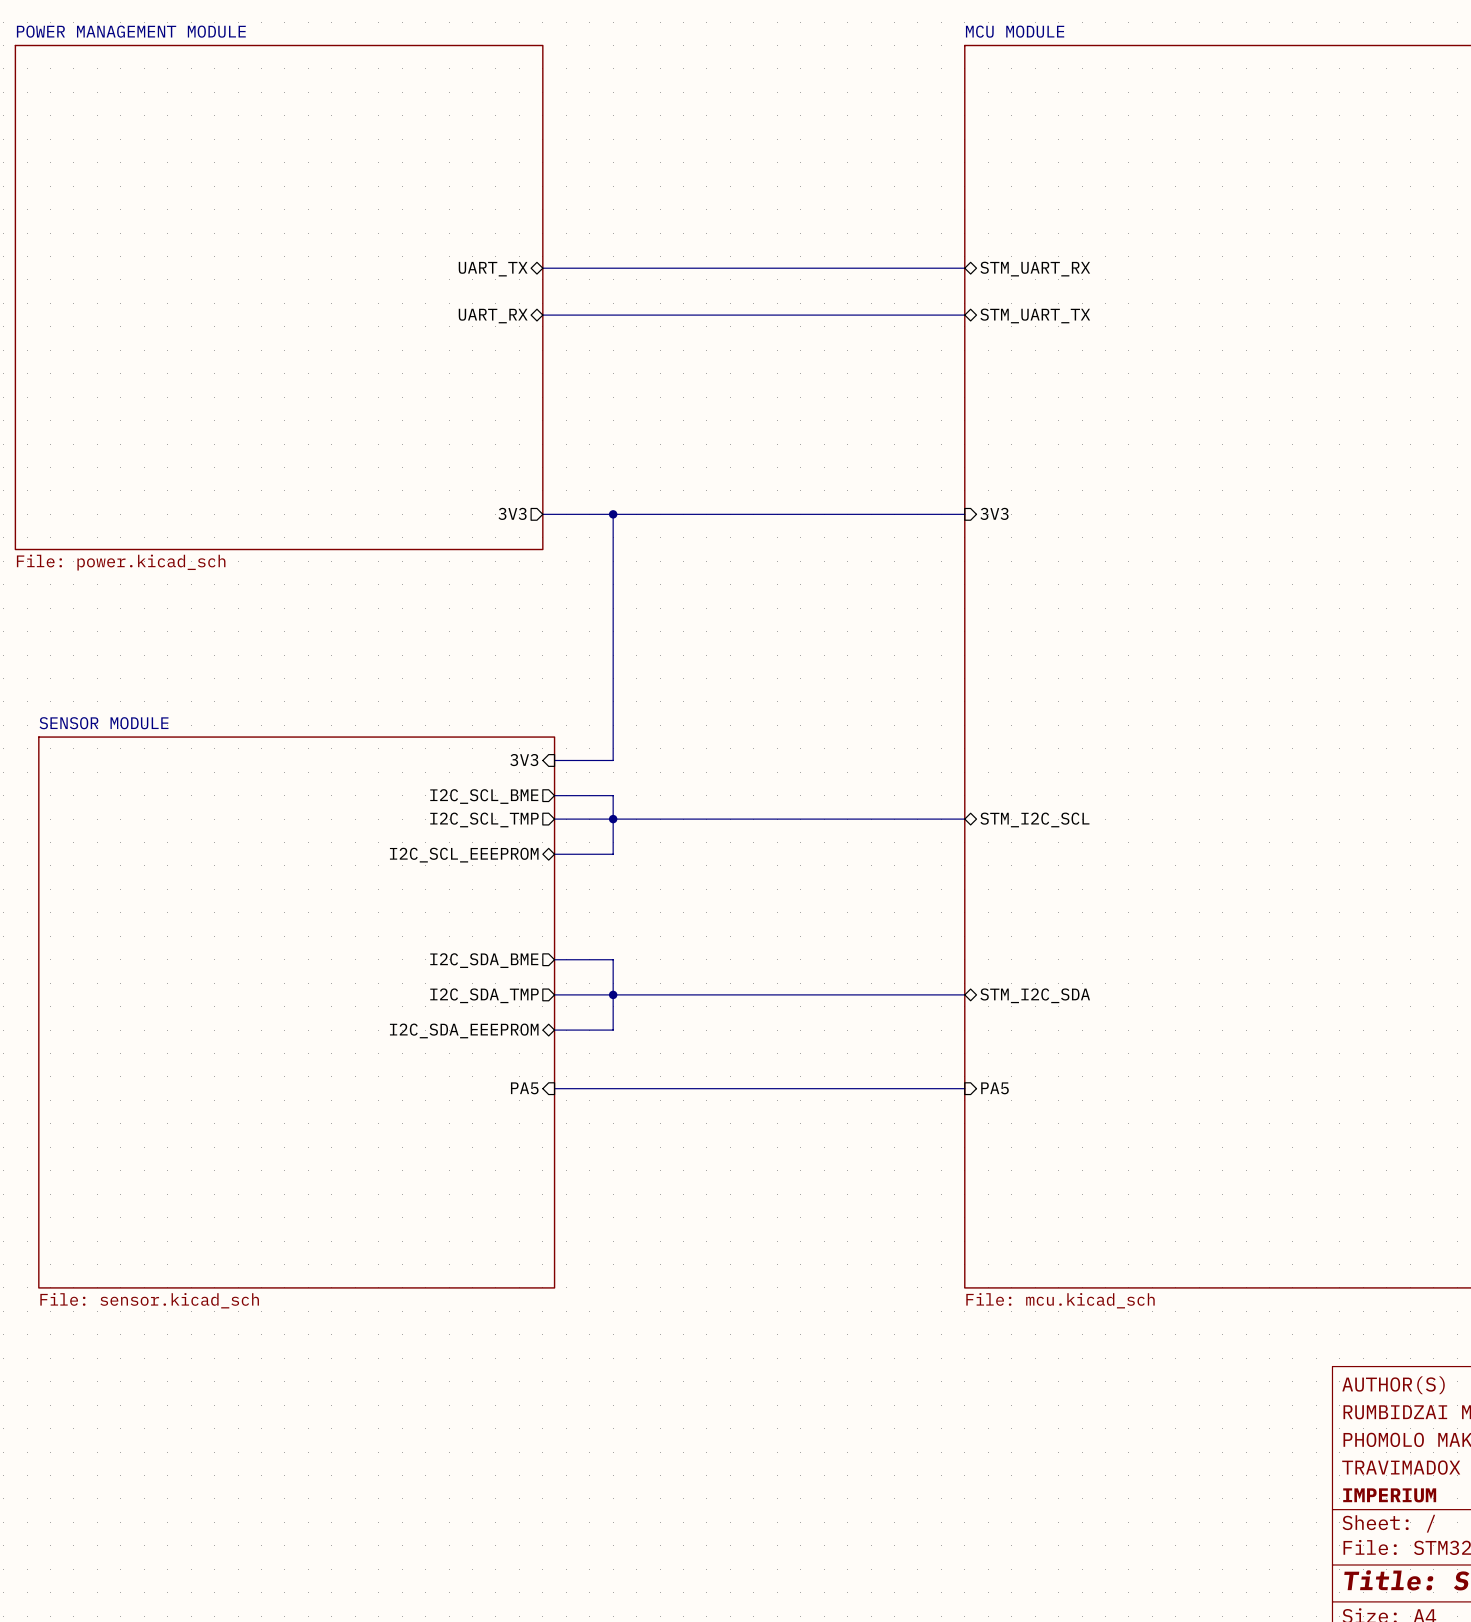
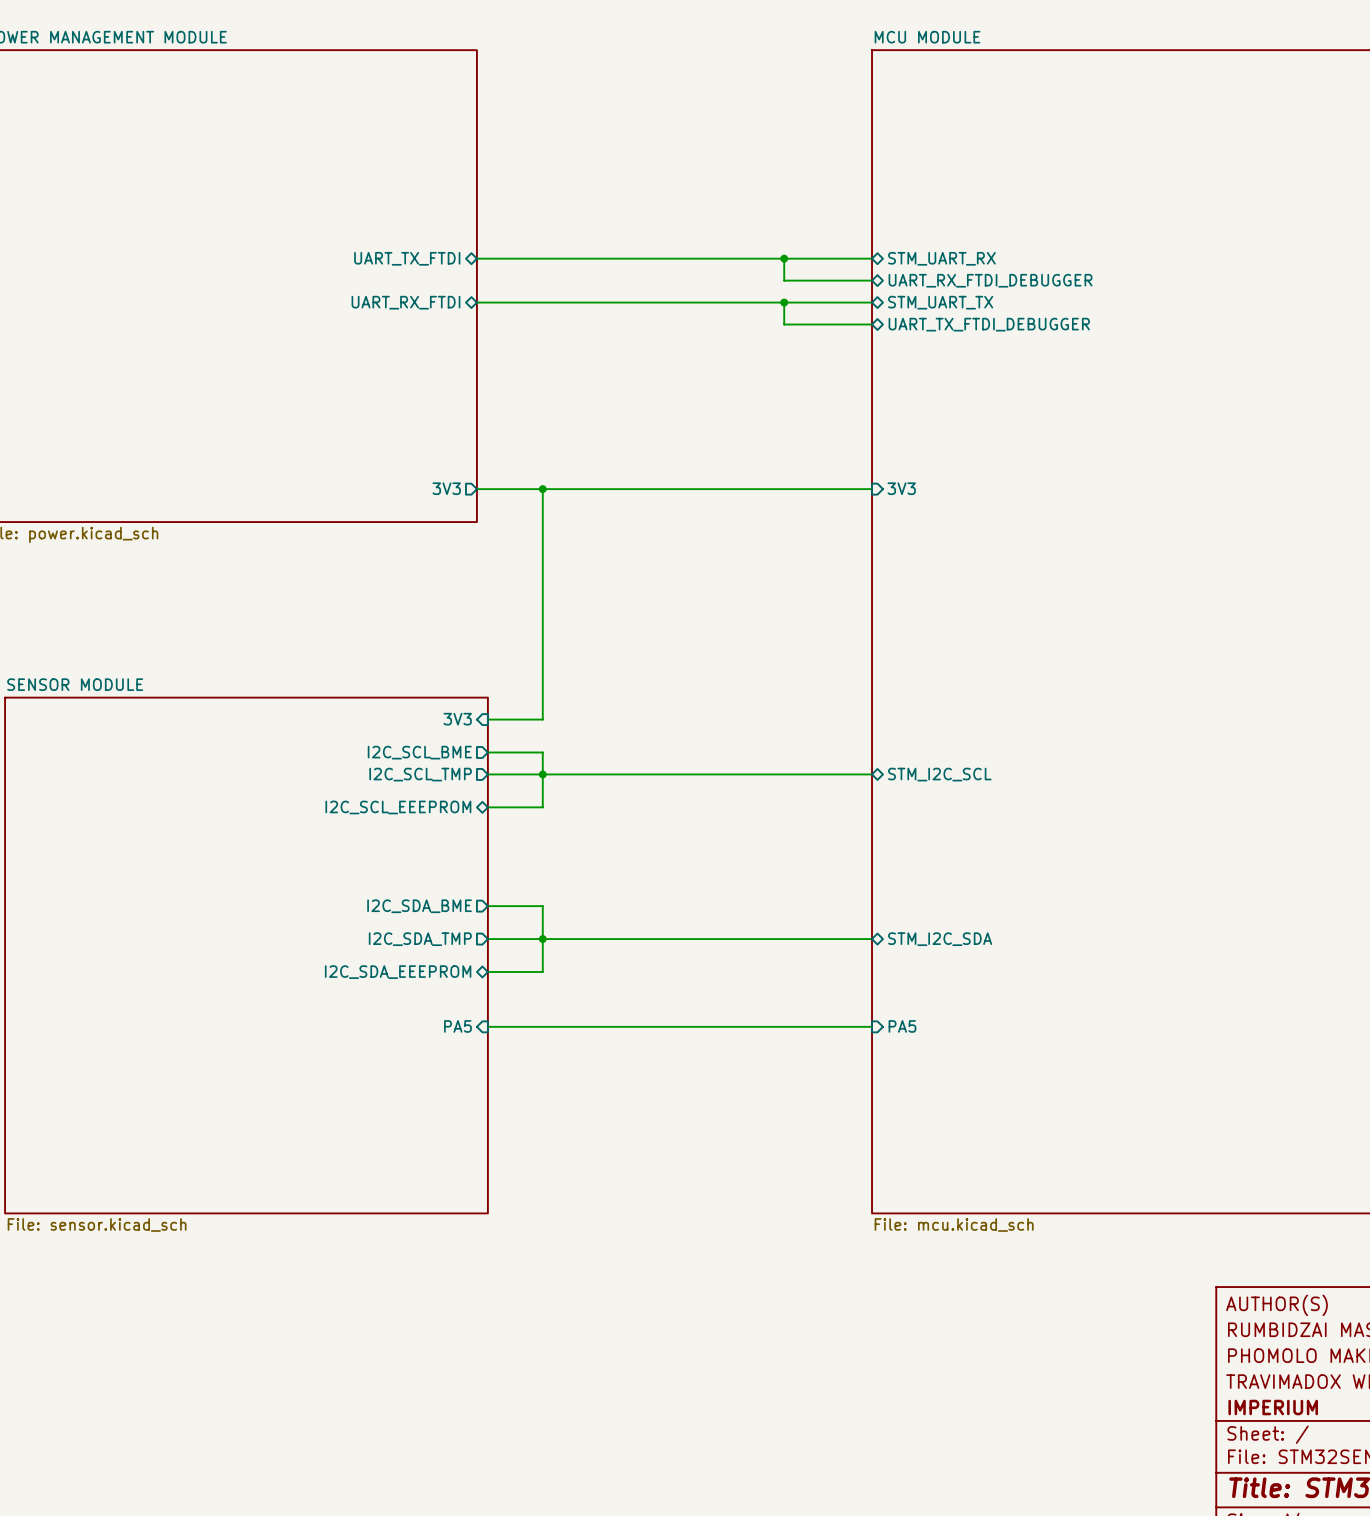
wire: none -> (784, 258) (784, 280) (872, 280)
junction: none -> (784, 258)
sheet pin: UART_TX (493, 269) -> UART_TX_FTDI (407, 258)
sheet pin: none -> UART_RX_FTDI_DEBUGGER (990, 280)
wire: none -> (784, 302) (784, 324) (872, 324)
junction: none -> (784, 302)
sheet pin: UART_RX (493, 316) -> UART_RX_FTDI (405, 302)
sheet pin: none -> UART_TX_FTDI_DEBUGGER (989, 324)

